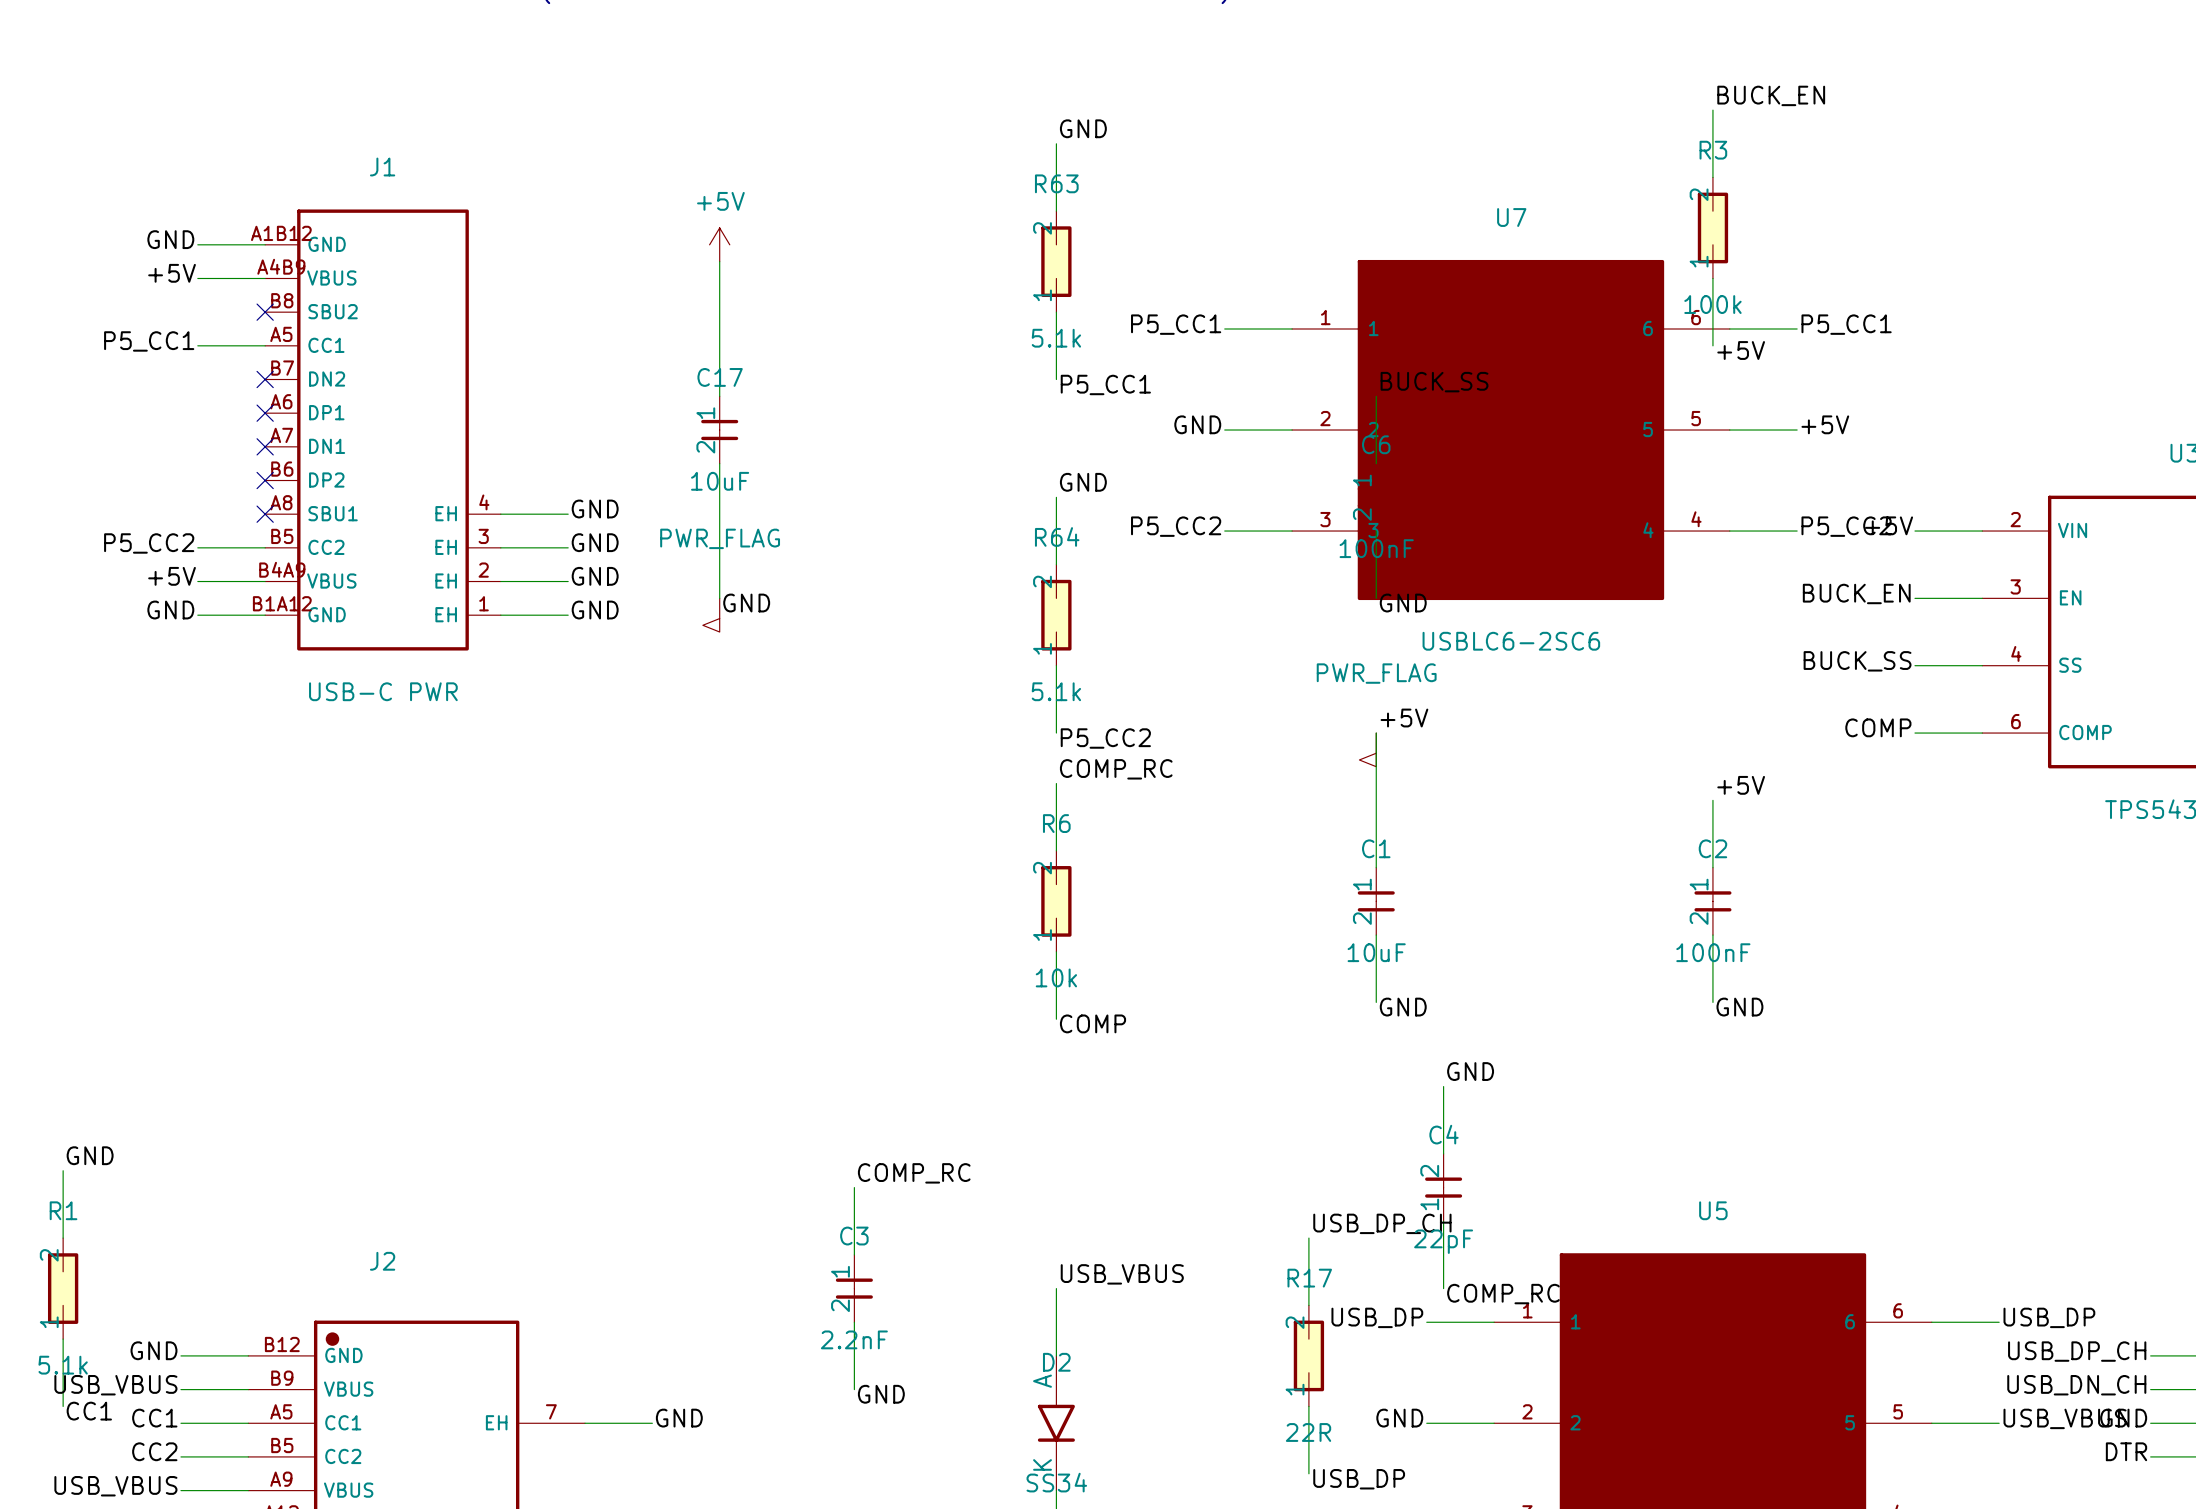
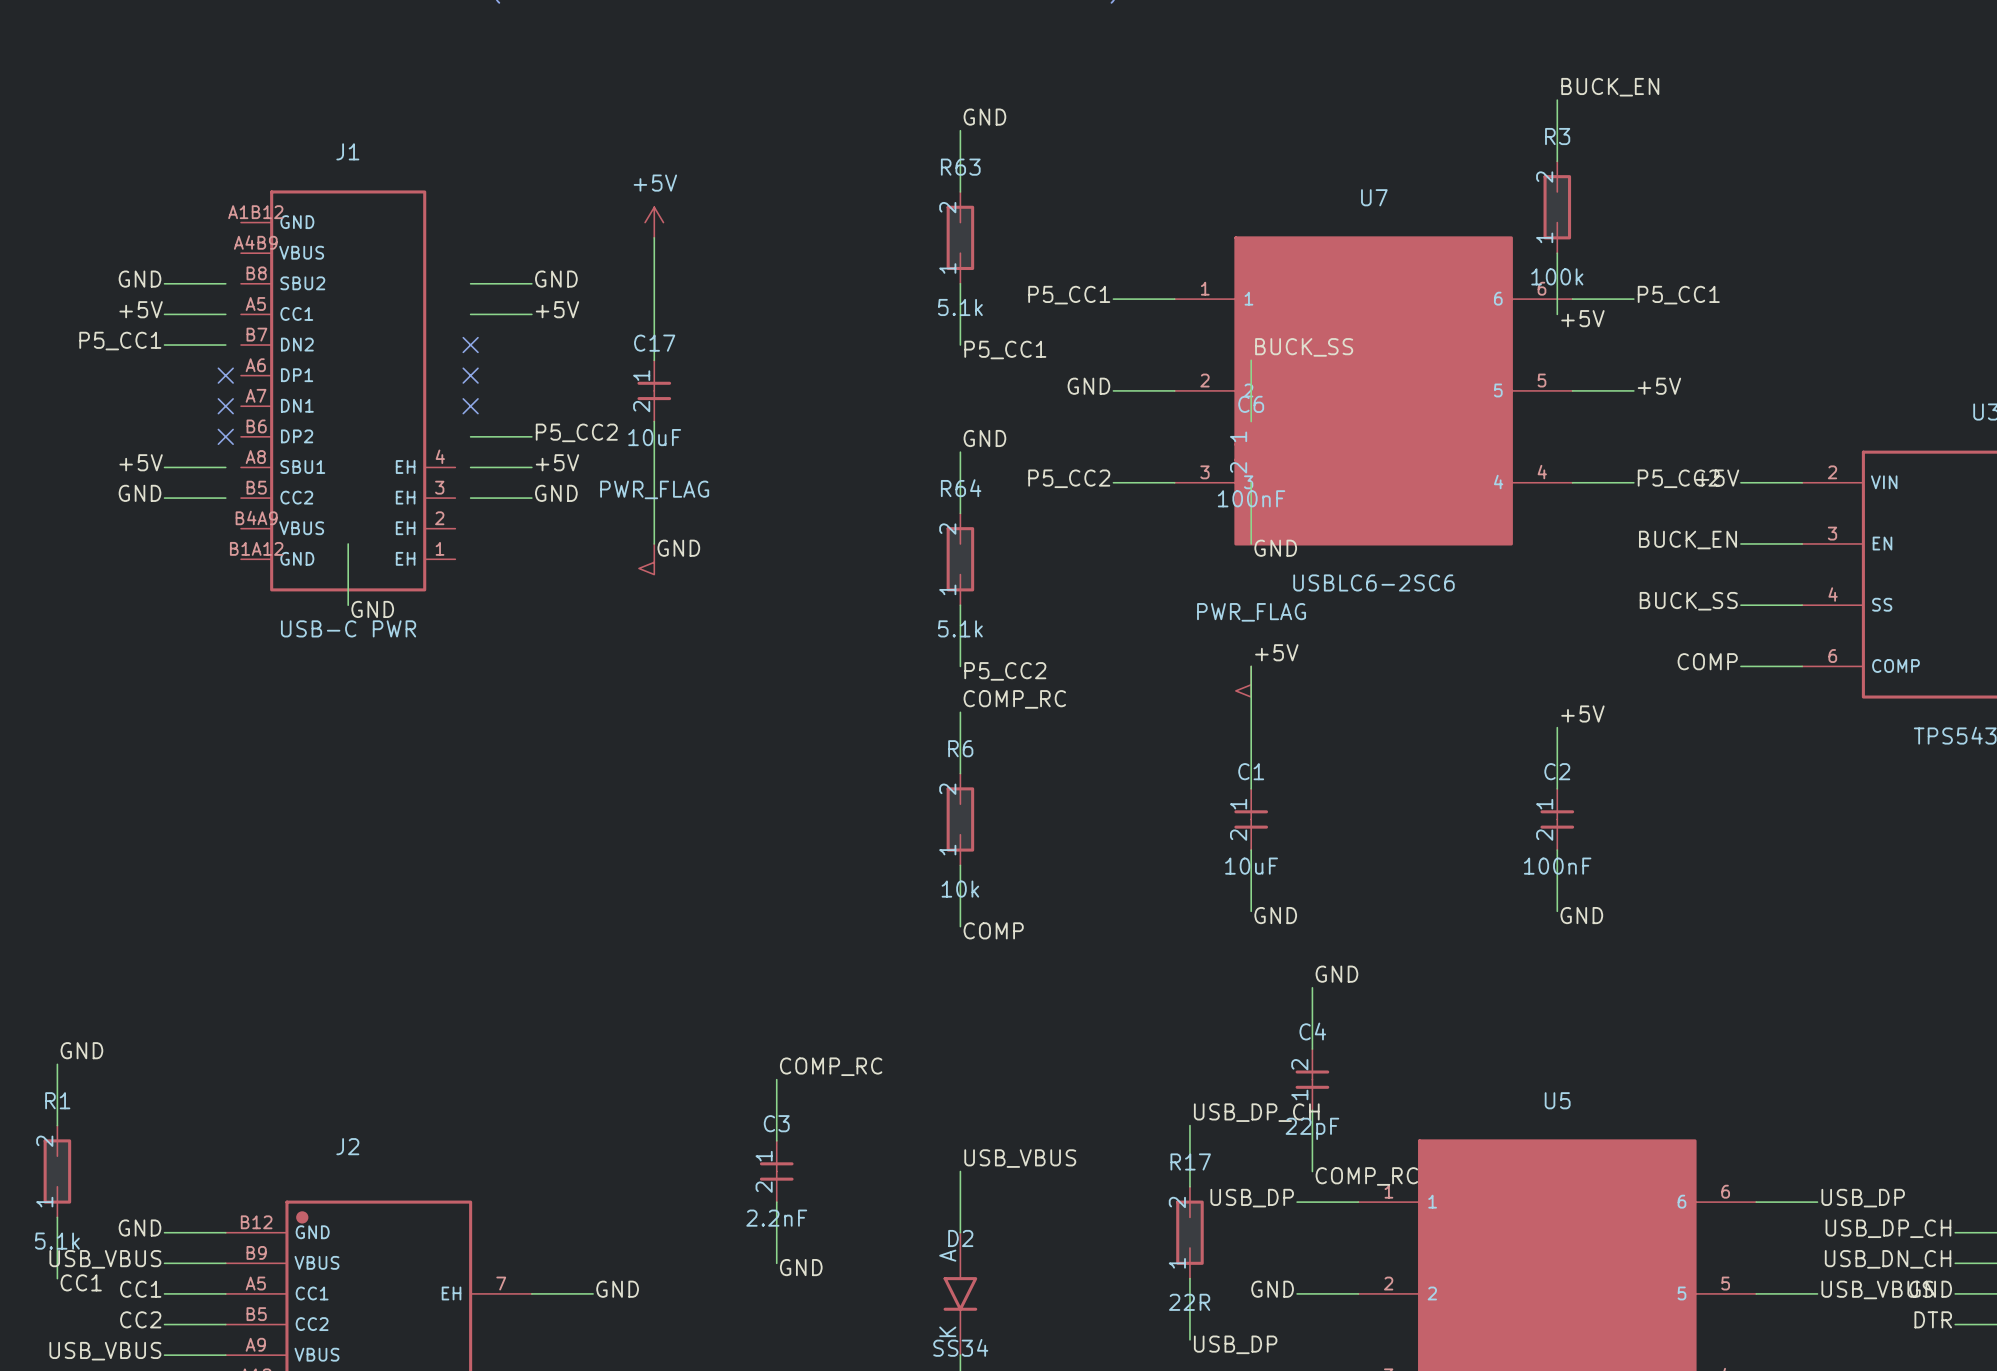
label position: GND (170, 239) -> GND (140, 279)
wire: (197, 244) (265, 244) -> (164, 345) (225, 345)
label position: +5V (172, 273) -> +5V (141, 309)
wire: (197, 278) (265, 278) -> (164, 283) (225, 283)
label: none -> GND (556, 279)
no-connect mark: (265, 312) -> none
label: none -> +5V (557, 309)
label position: P5_CC1 (149, 341) -> P5_CC1 (120, 341)
wire: (248, 345) (265, 345) -> (164, 314) (179, 314)
no-connect mark: (265, 379) -> none
no-connect mark: none -> (470, 345)
no-connect mark position: (265, 413) -> (225, 375)
no-connect mark: none -> (470, 375)
no-connect mark position: (265, 446) -> (225, 406)
no-connect mark: none -> (470, 406)
label: none -> P5_CC2 (576, 432)
no-connect mark position: (265, 480) -> (225, 436)
wire: none -> (470, 436) (531, 436)
label: GND (595, 509) -> none
label: none -> +5V (557, 462)
no-connect mark: (265, 514) -> none
wire: (500, 514) (517, 514) -> (516, 467) (531, 467)
label position: GND (595, 542) -> GND (556, 493)
label: P5_CC2 (149, 543) -> none
wire: (248, 547) (265, 547) -> (164, 498) (179, 498)
wire: (500, 547) (517, 547) -> (516, 498) (531, 498)
label position: +5V (172, 576) -> +5V (141, 462)
label: GND (595, 576) -> none
wire: (197, 581) (265, 581) -> (164, 467) (225, 467)
wire: (500, 581) (568, 581) -> (470, 283) (531, 283)
wire: none -> (348, 543) (348, 605)
label position: GND (170, 610) -> GND (140, 493)
label: GND (595, 610) -> none
wire: (197, 615) (265, 615) -> none
wire: (500, 615) (568, 615) -> (470, 314) (531, 314)
label: none -> GND (372, 609)

